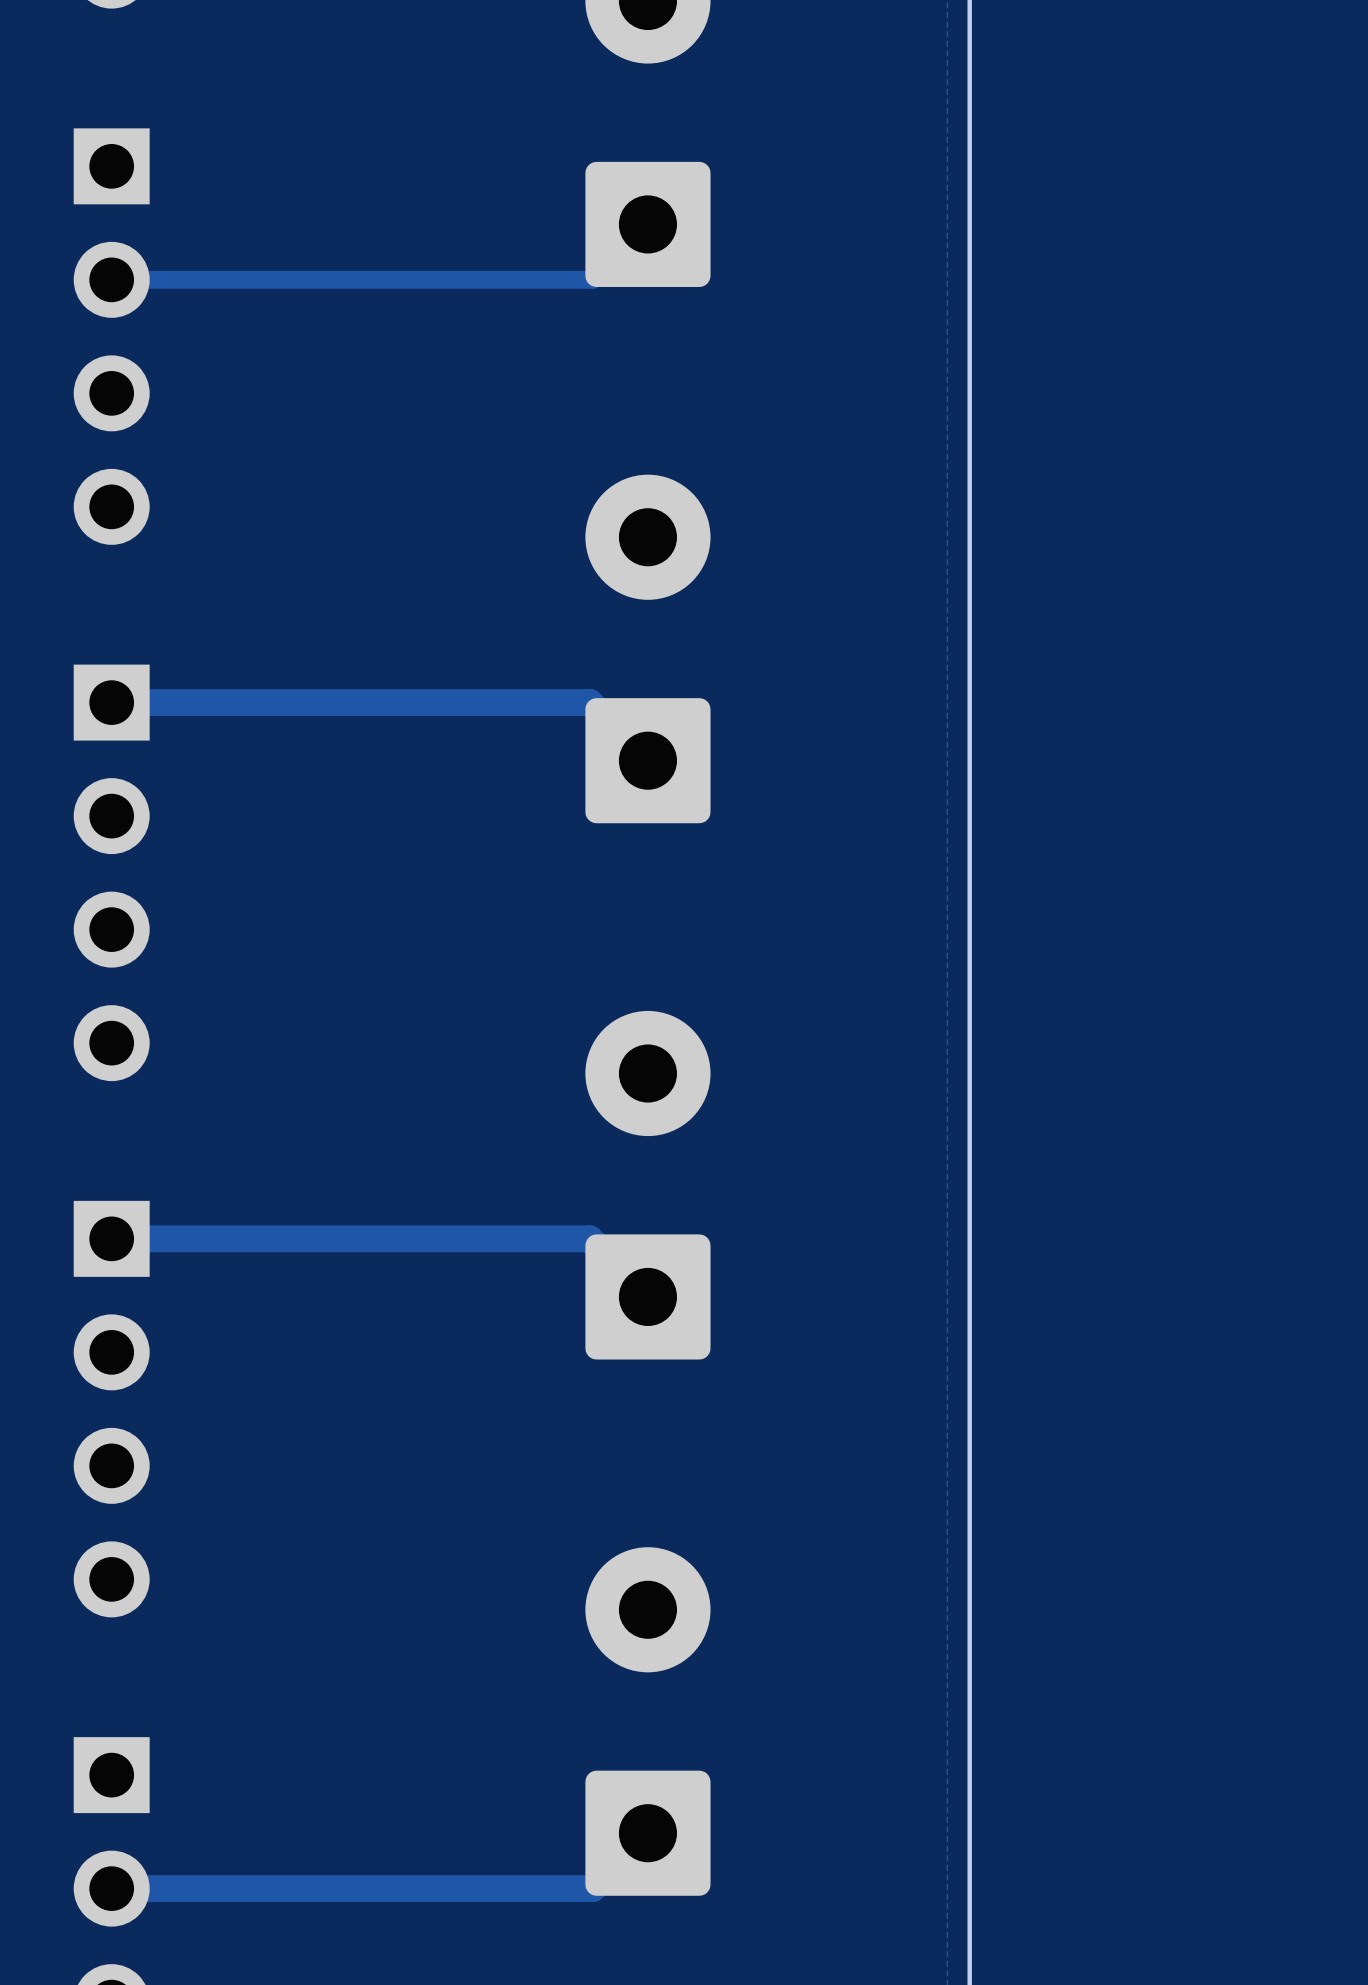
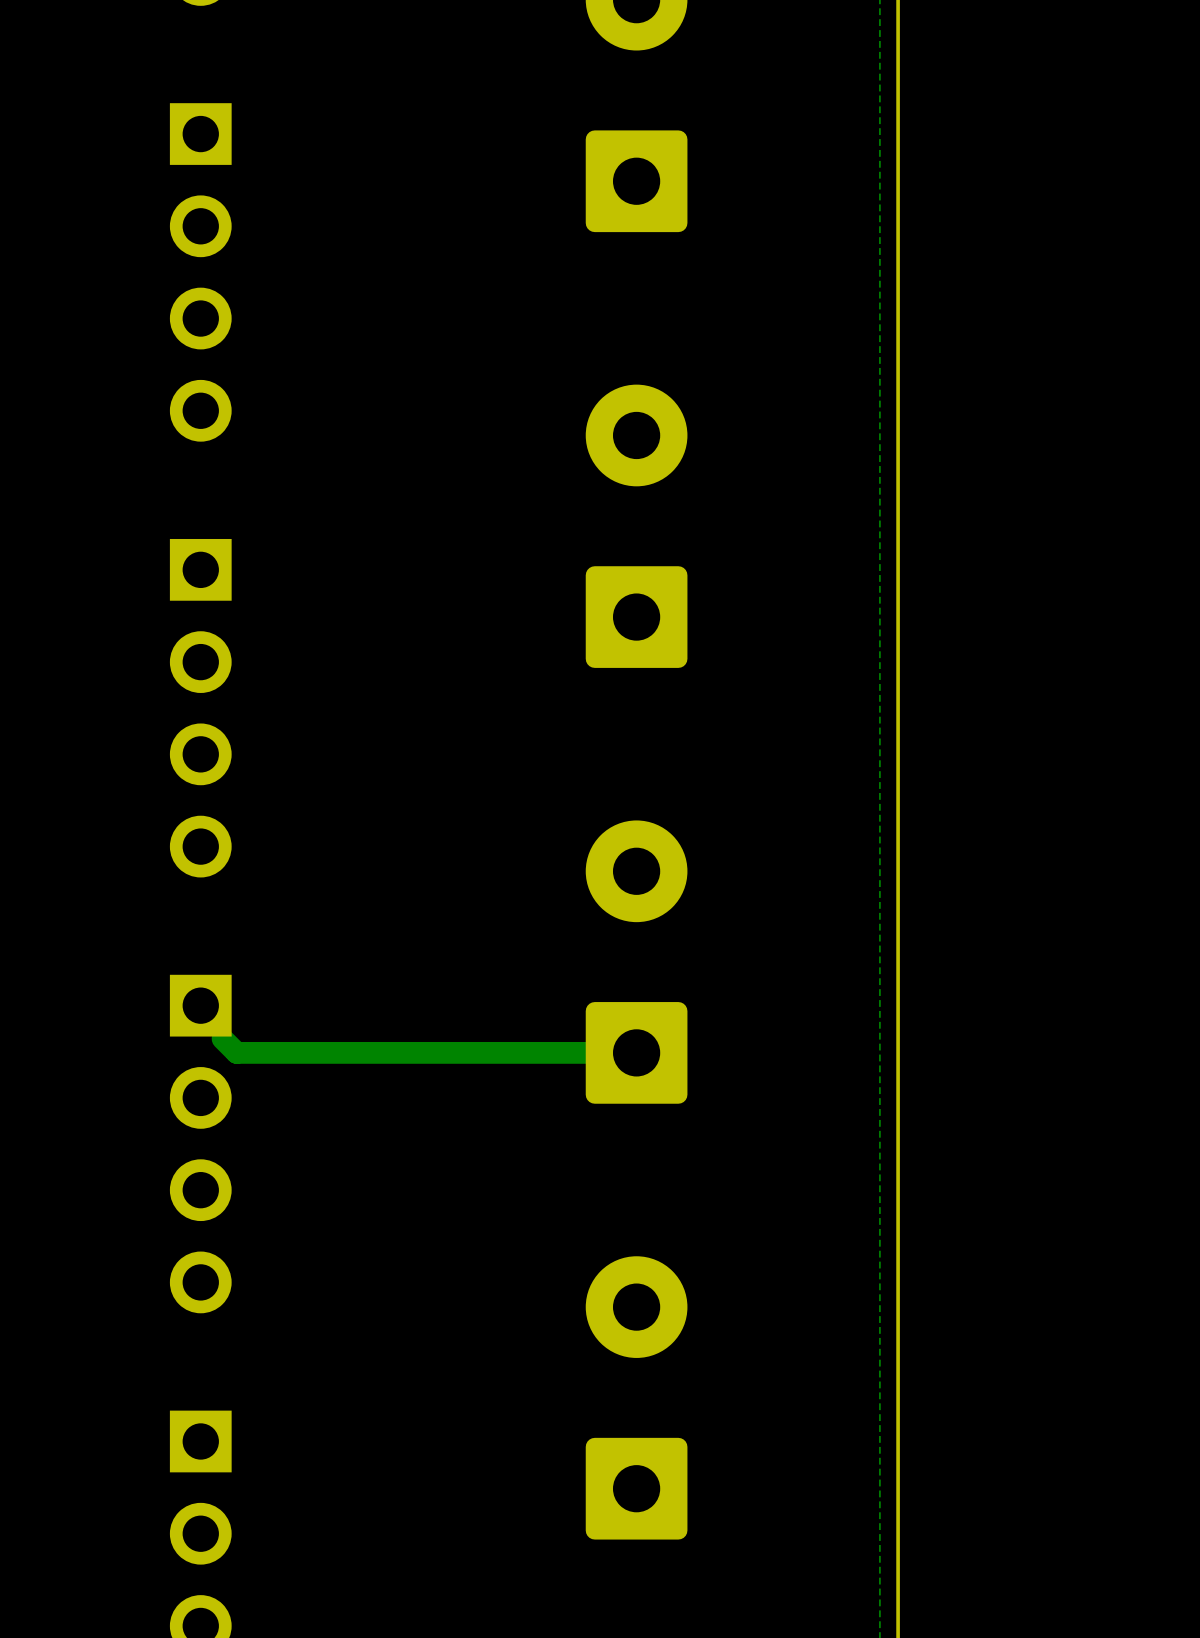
track: (647, 224) (592, 279) (111, 279) -> none
track: (111, 702) (589, 702) (647, 760) -> none
track: (111, 1238) (589, 1238) (647, 1296) -> none
track: none -> (222, 1038) (236, 1052) (651, 1052)
track: (647, 1833) (592, 1888) (111, 1888) -> none

